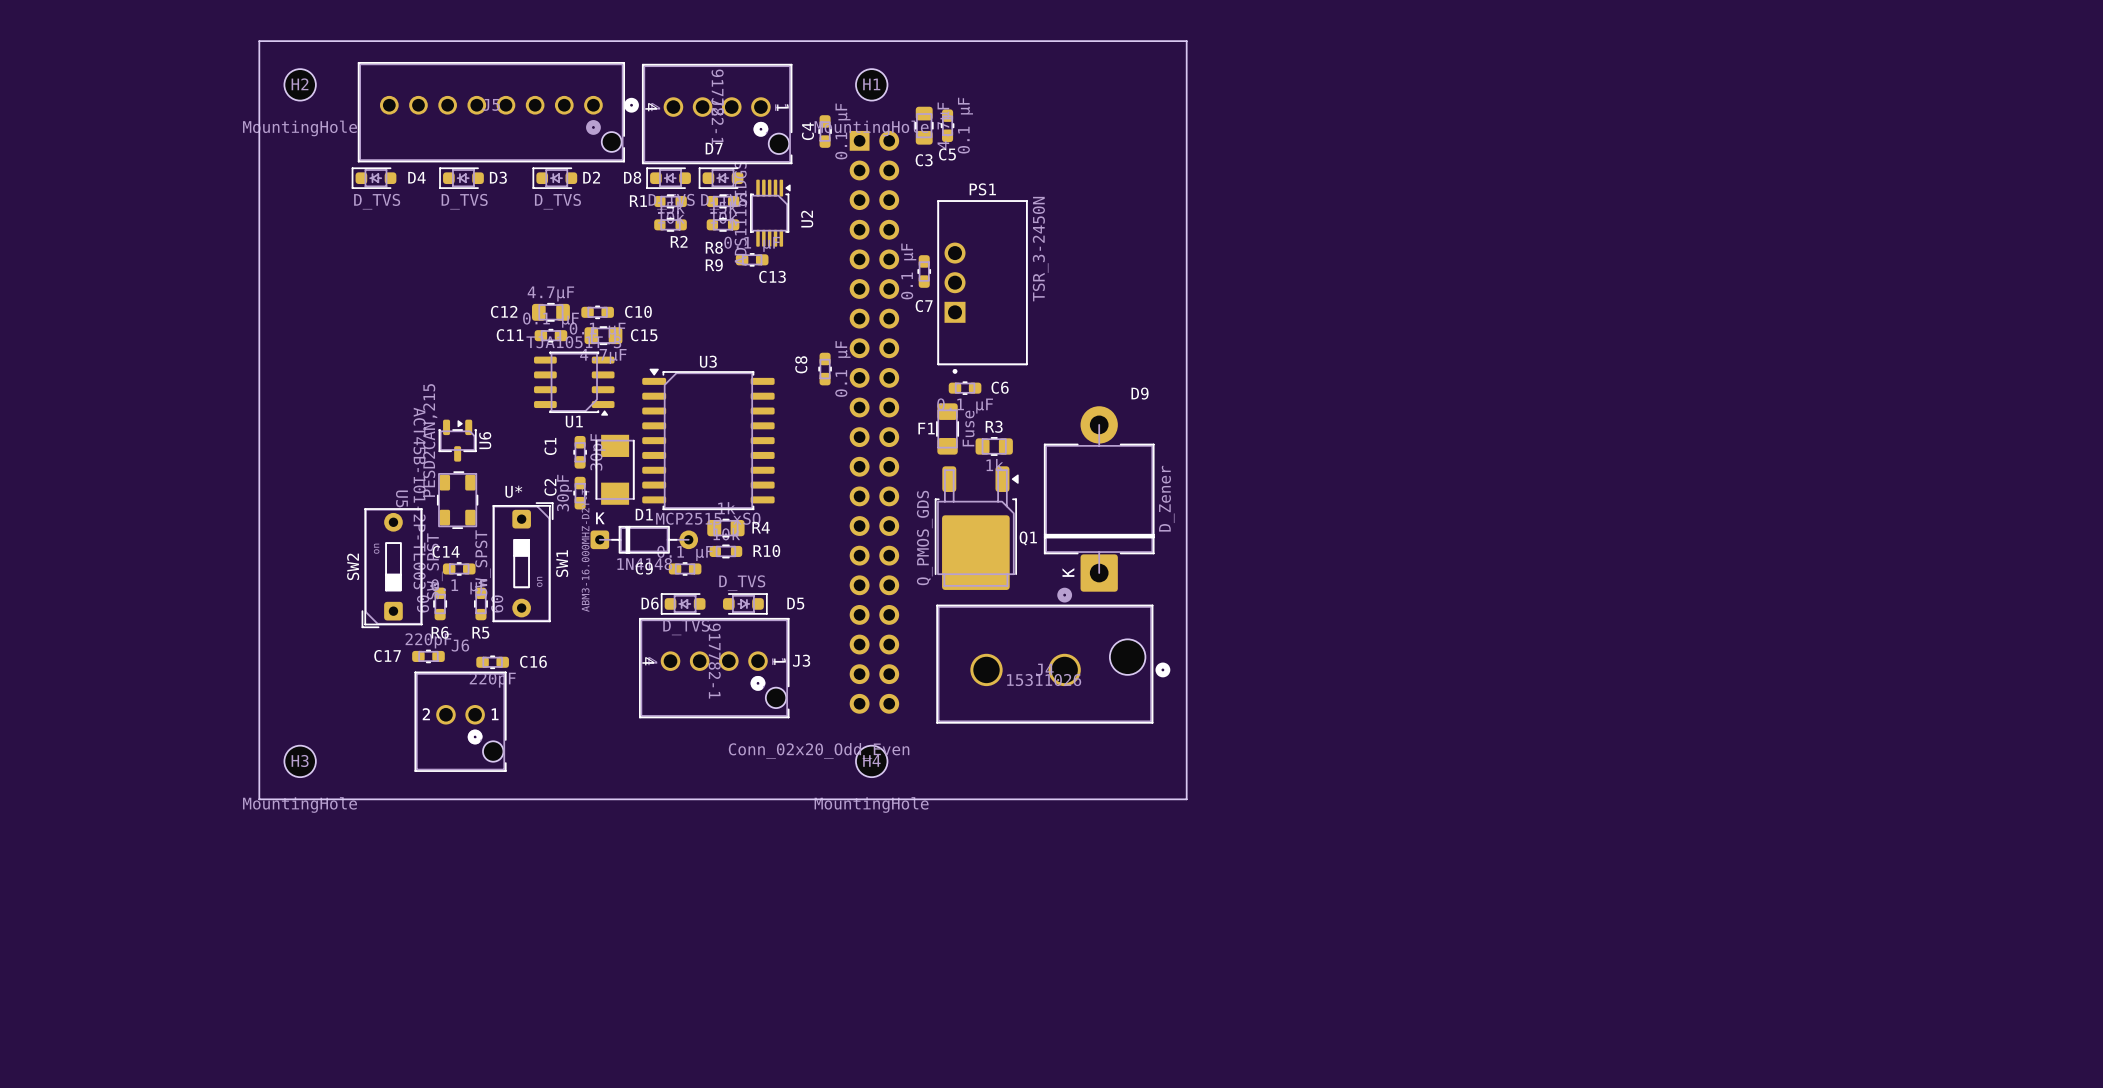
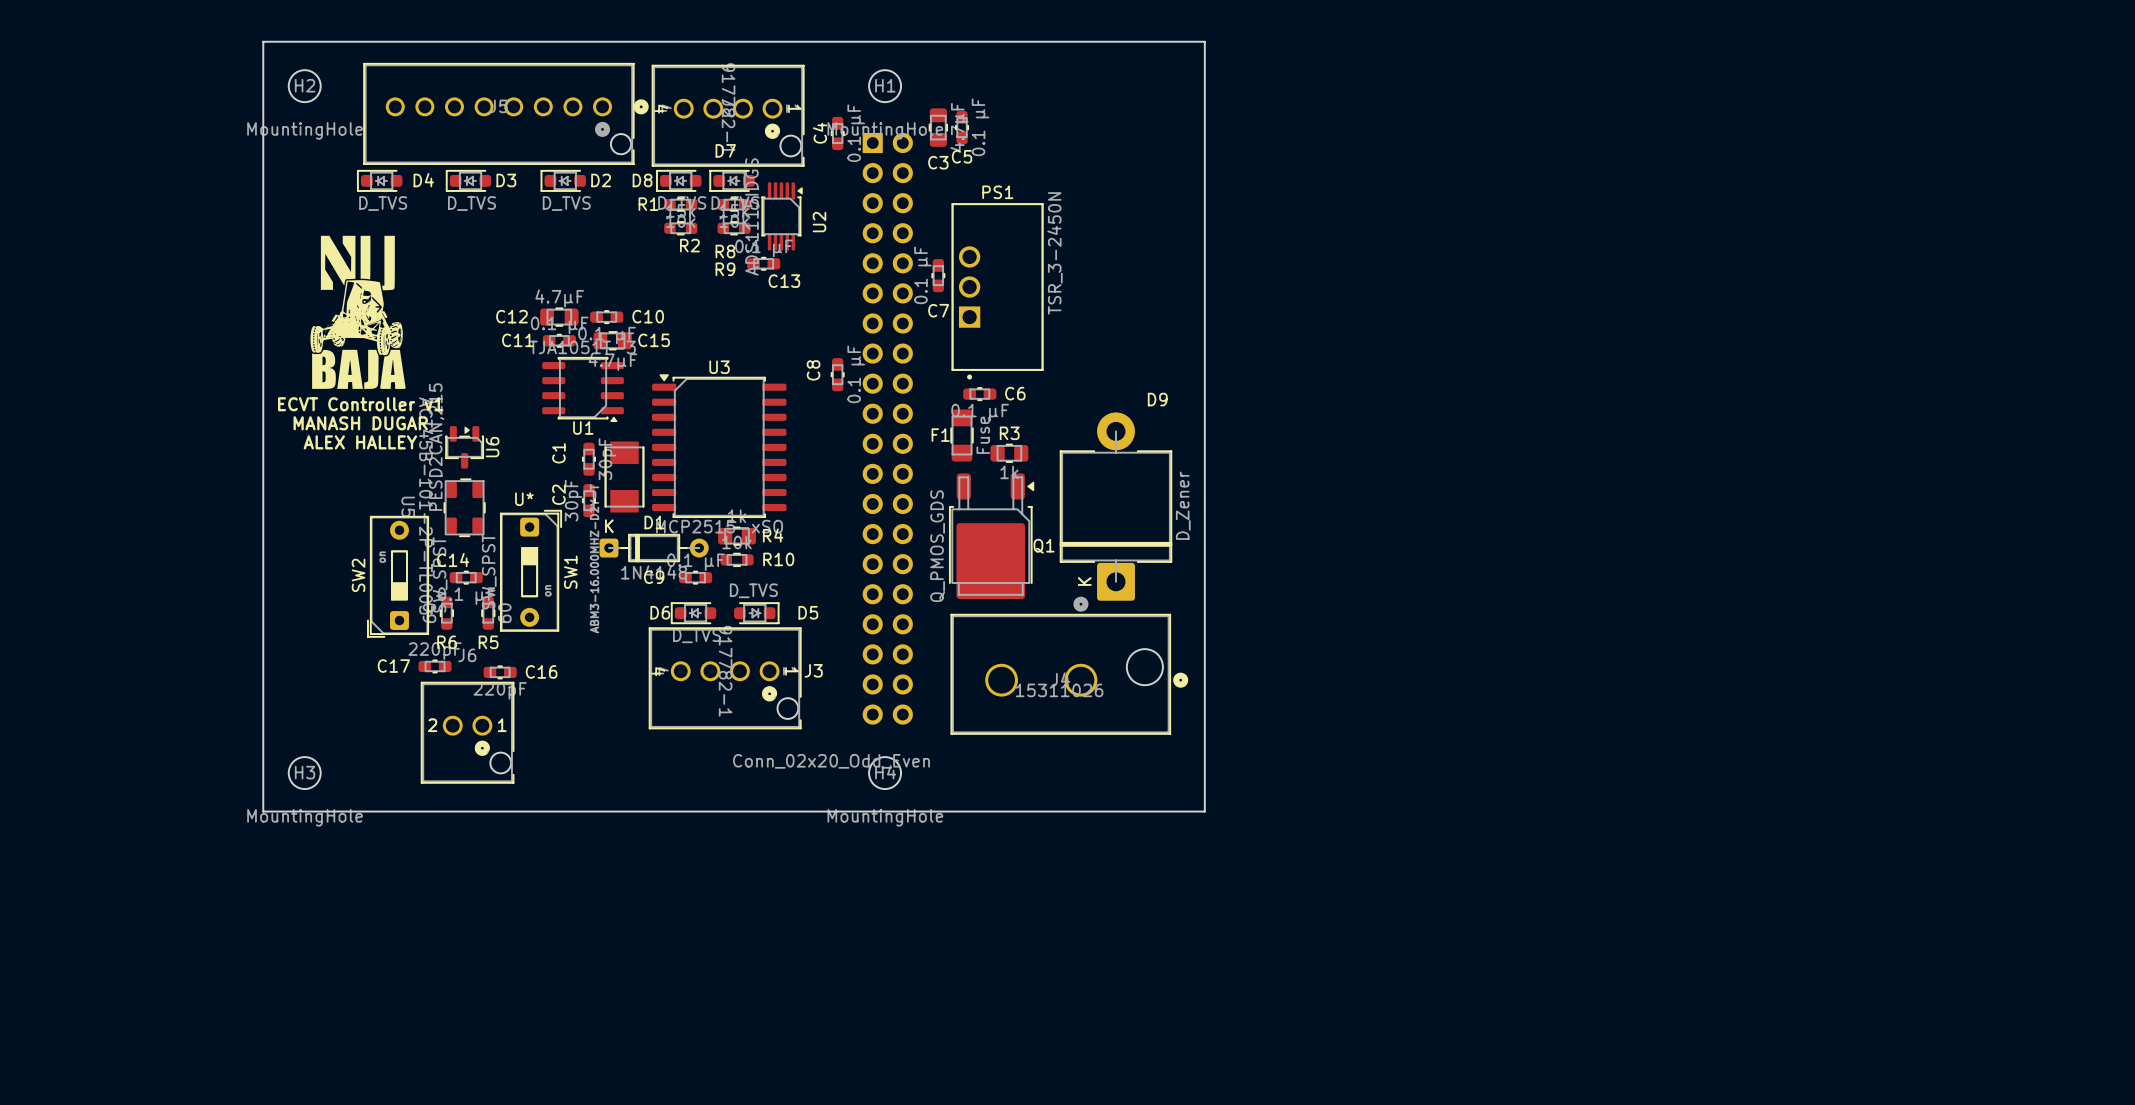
drawing: none -> [310, 235, 406, 389]
text: none -> ECVT Controller v1 (360, 404)
text: none -> MANASH DUGAR (360, 423)
text: none -> ALEX HALLEY (360, 442)

